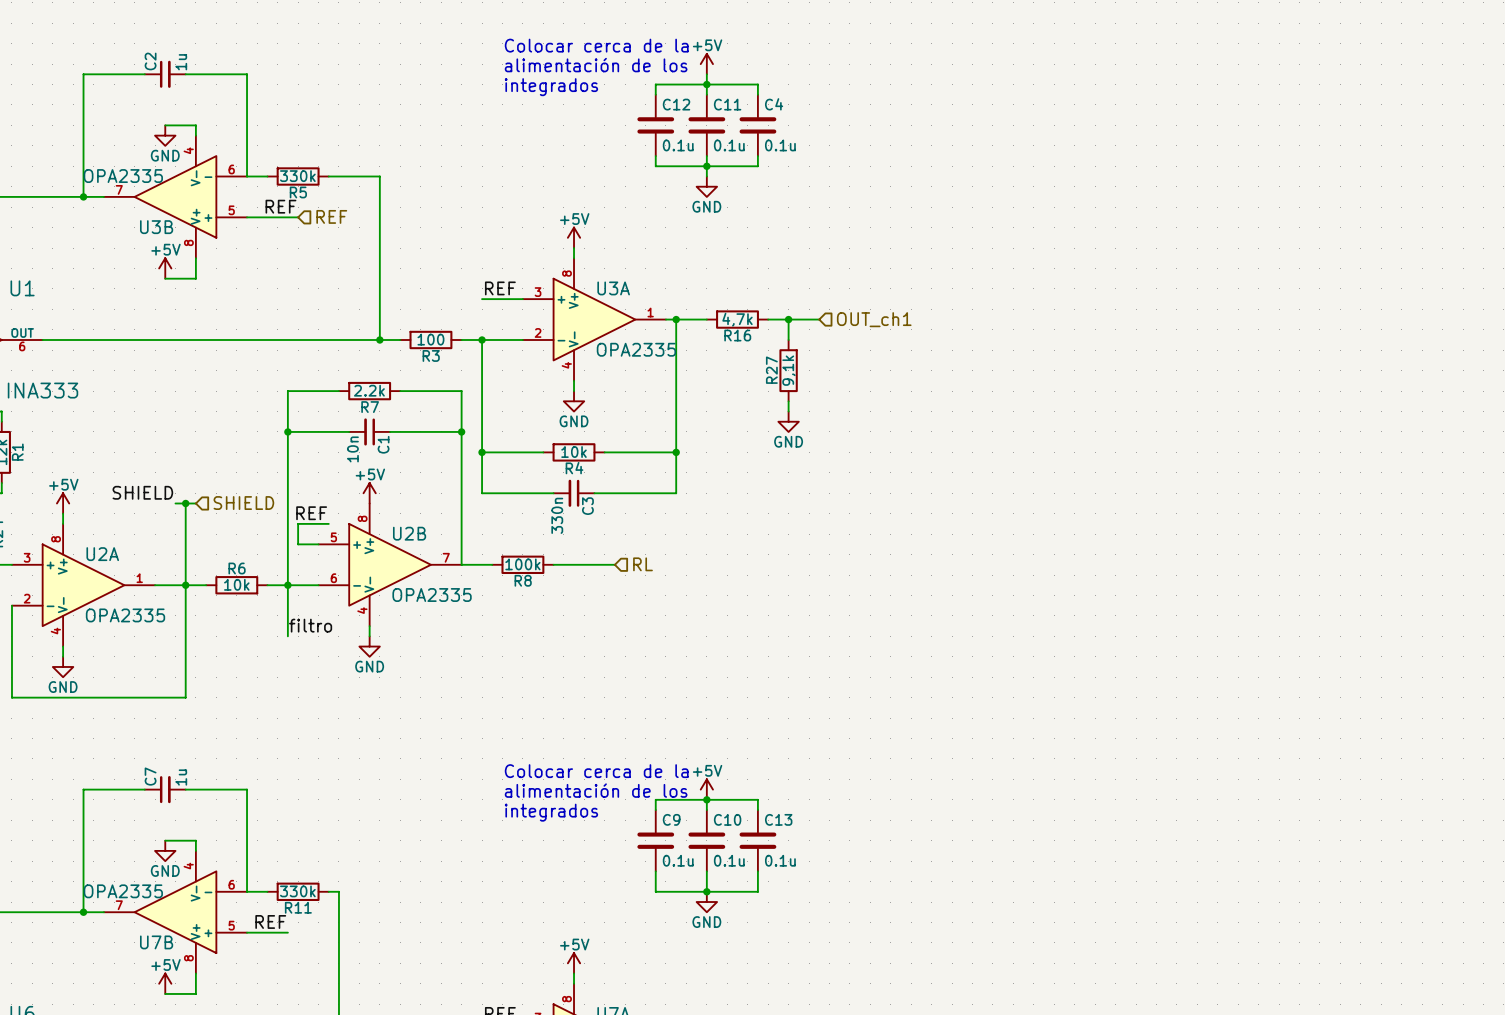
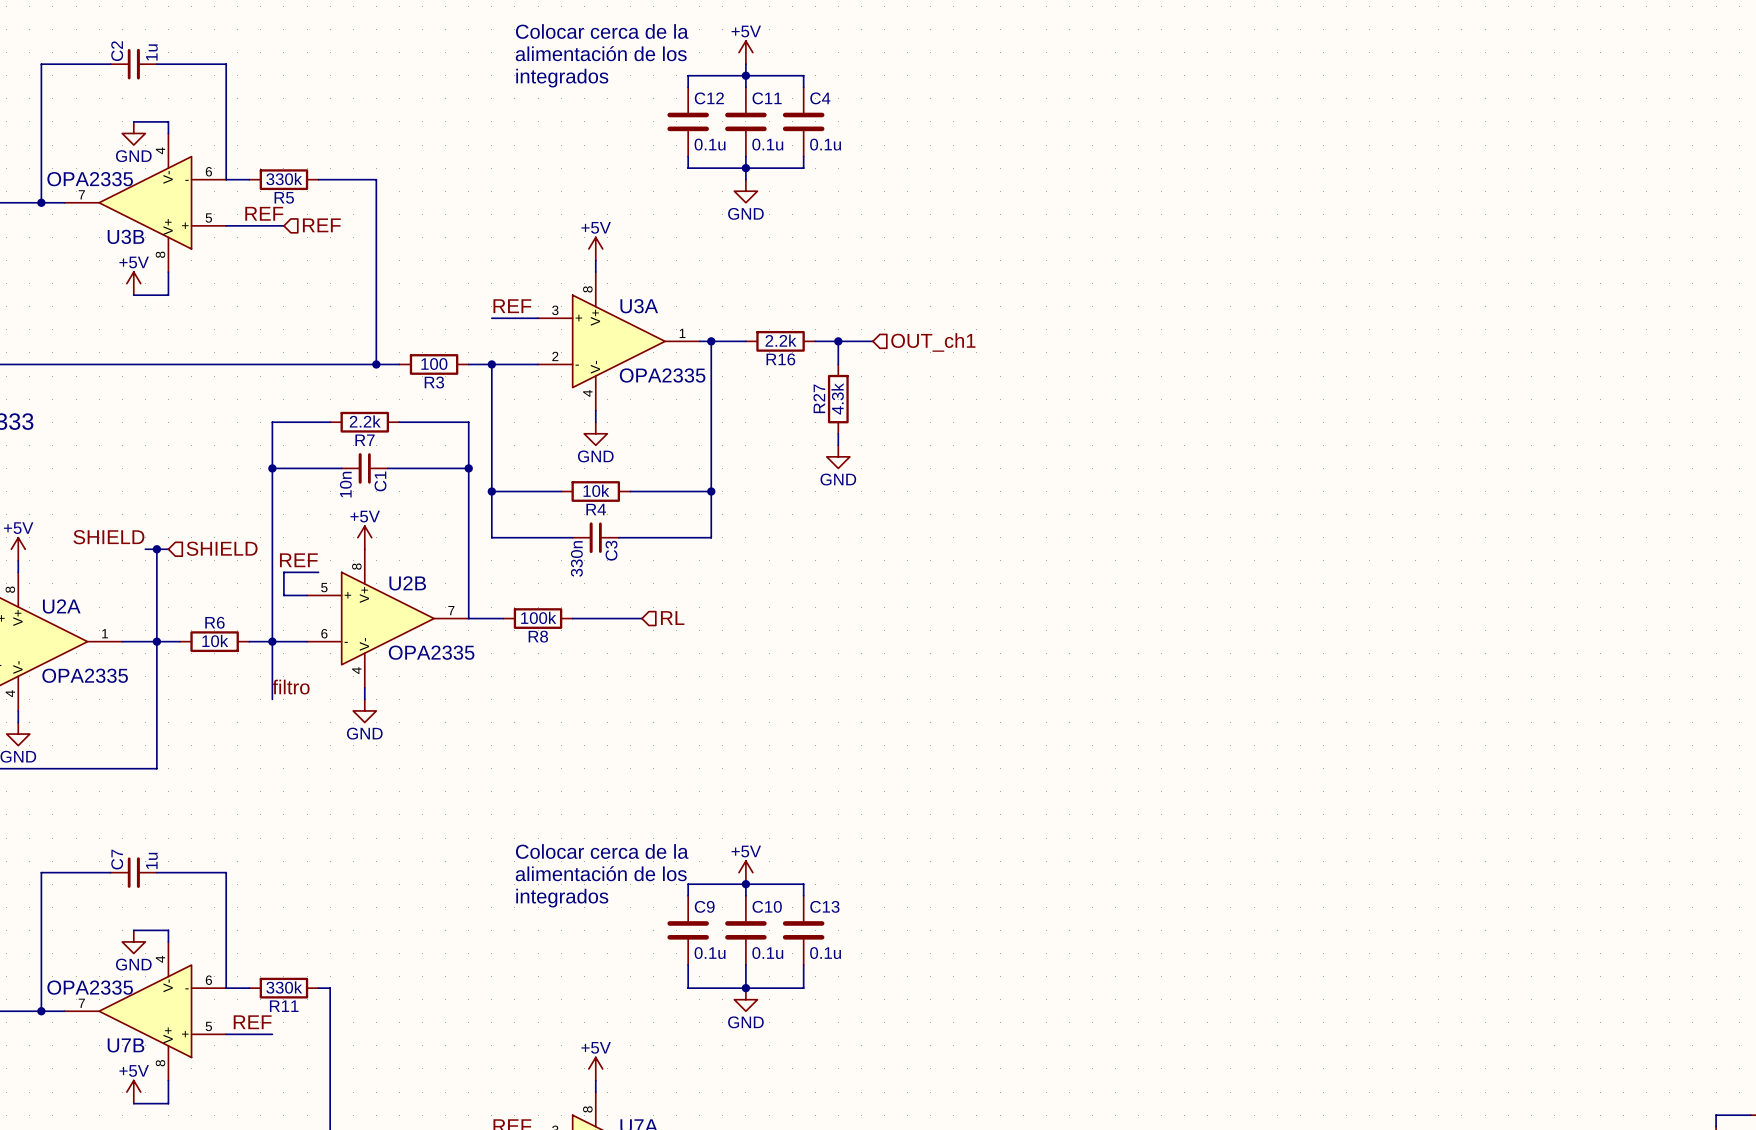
R16 value: 4,7k (737, 319) -> 2.2k (780, 340)
R27 value: 9,1k (788, 370) -> 4.3k (837, 398)

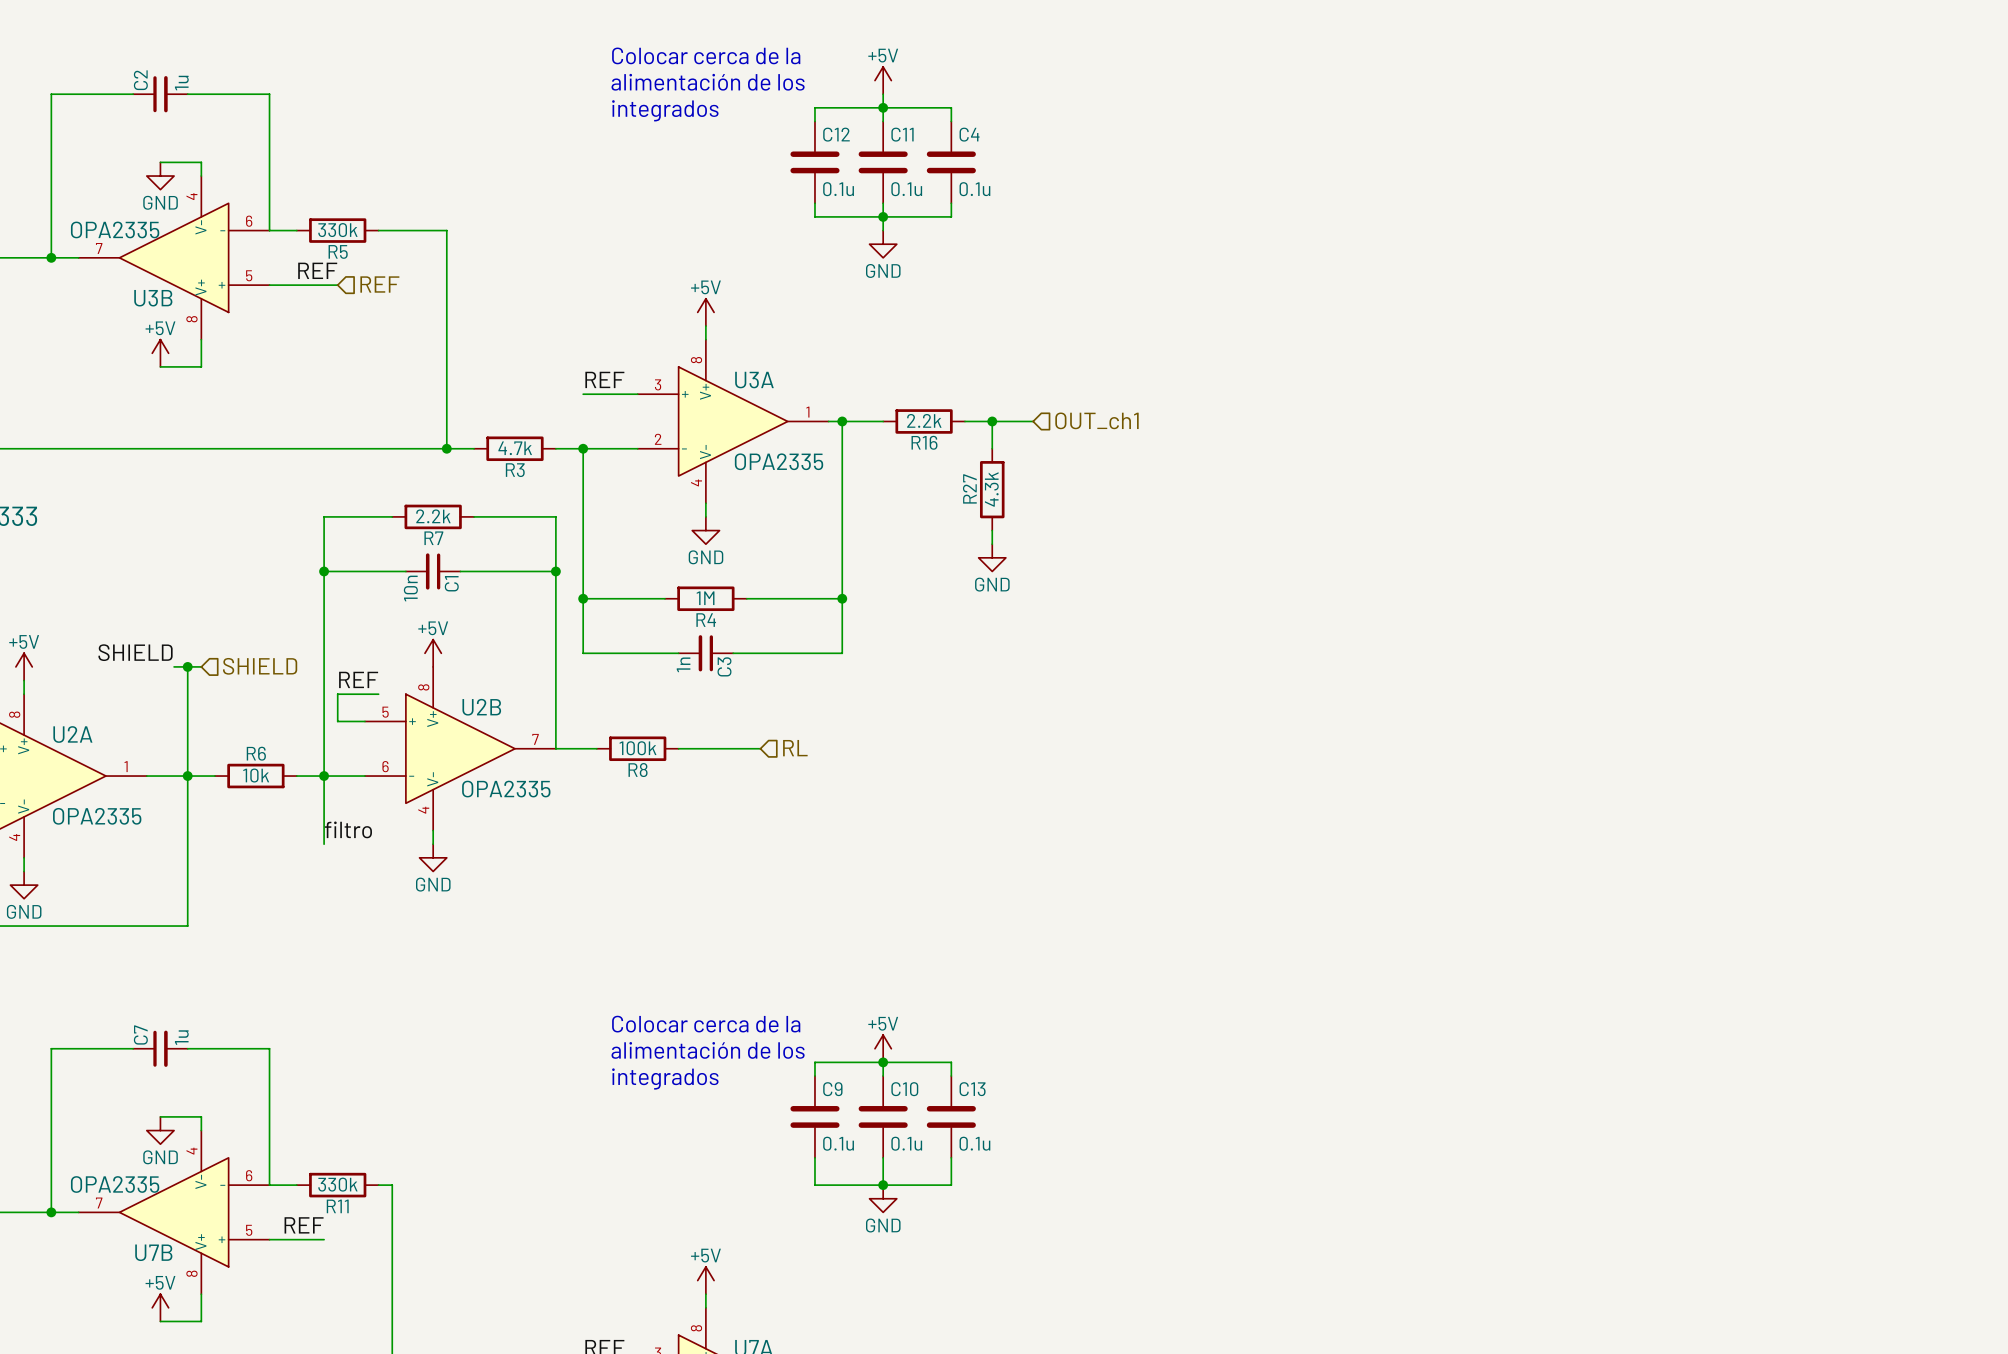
R3 value: 100 (434, 364) -> 4.7k (515, 448)
R4 value: 10k (596, 490) -> 1M (705, 598)
C3 value: 330n (576, 558) -> 1n (683, 664)

